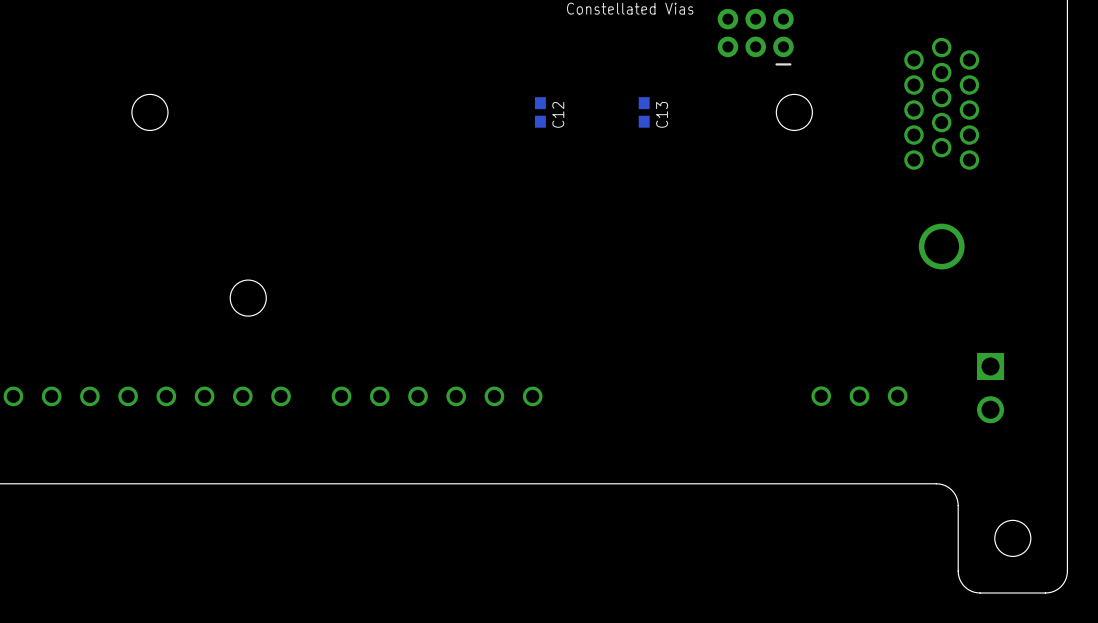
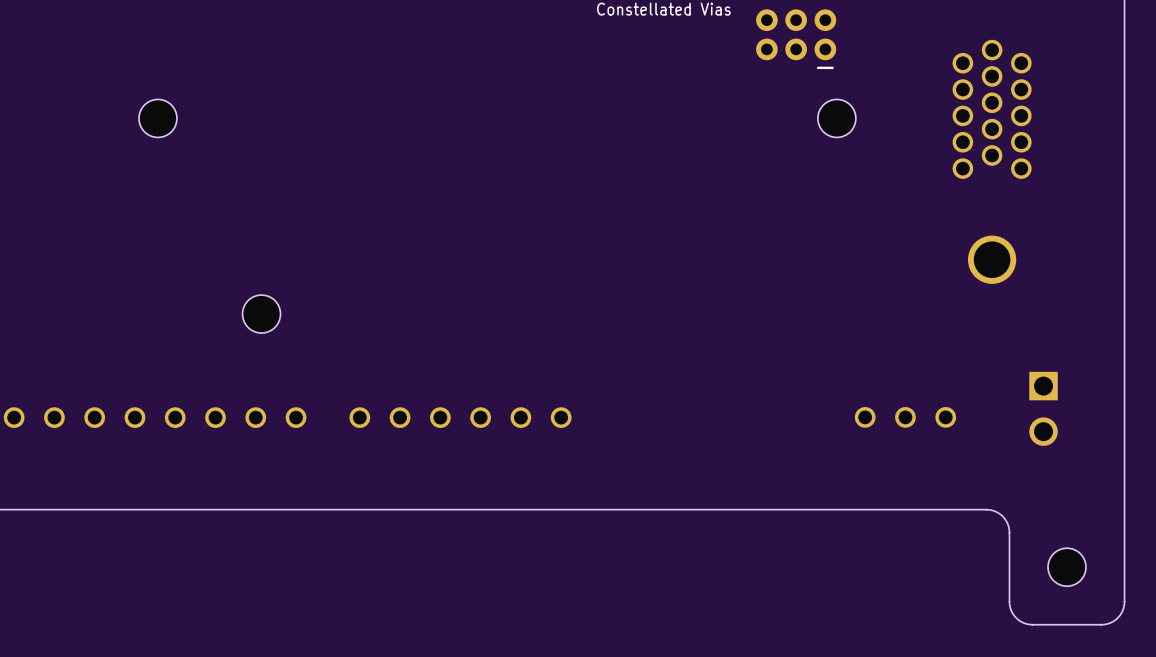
C12: (540, 112) -> none
C13: (644, 112) -> none

